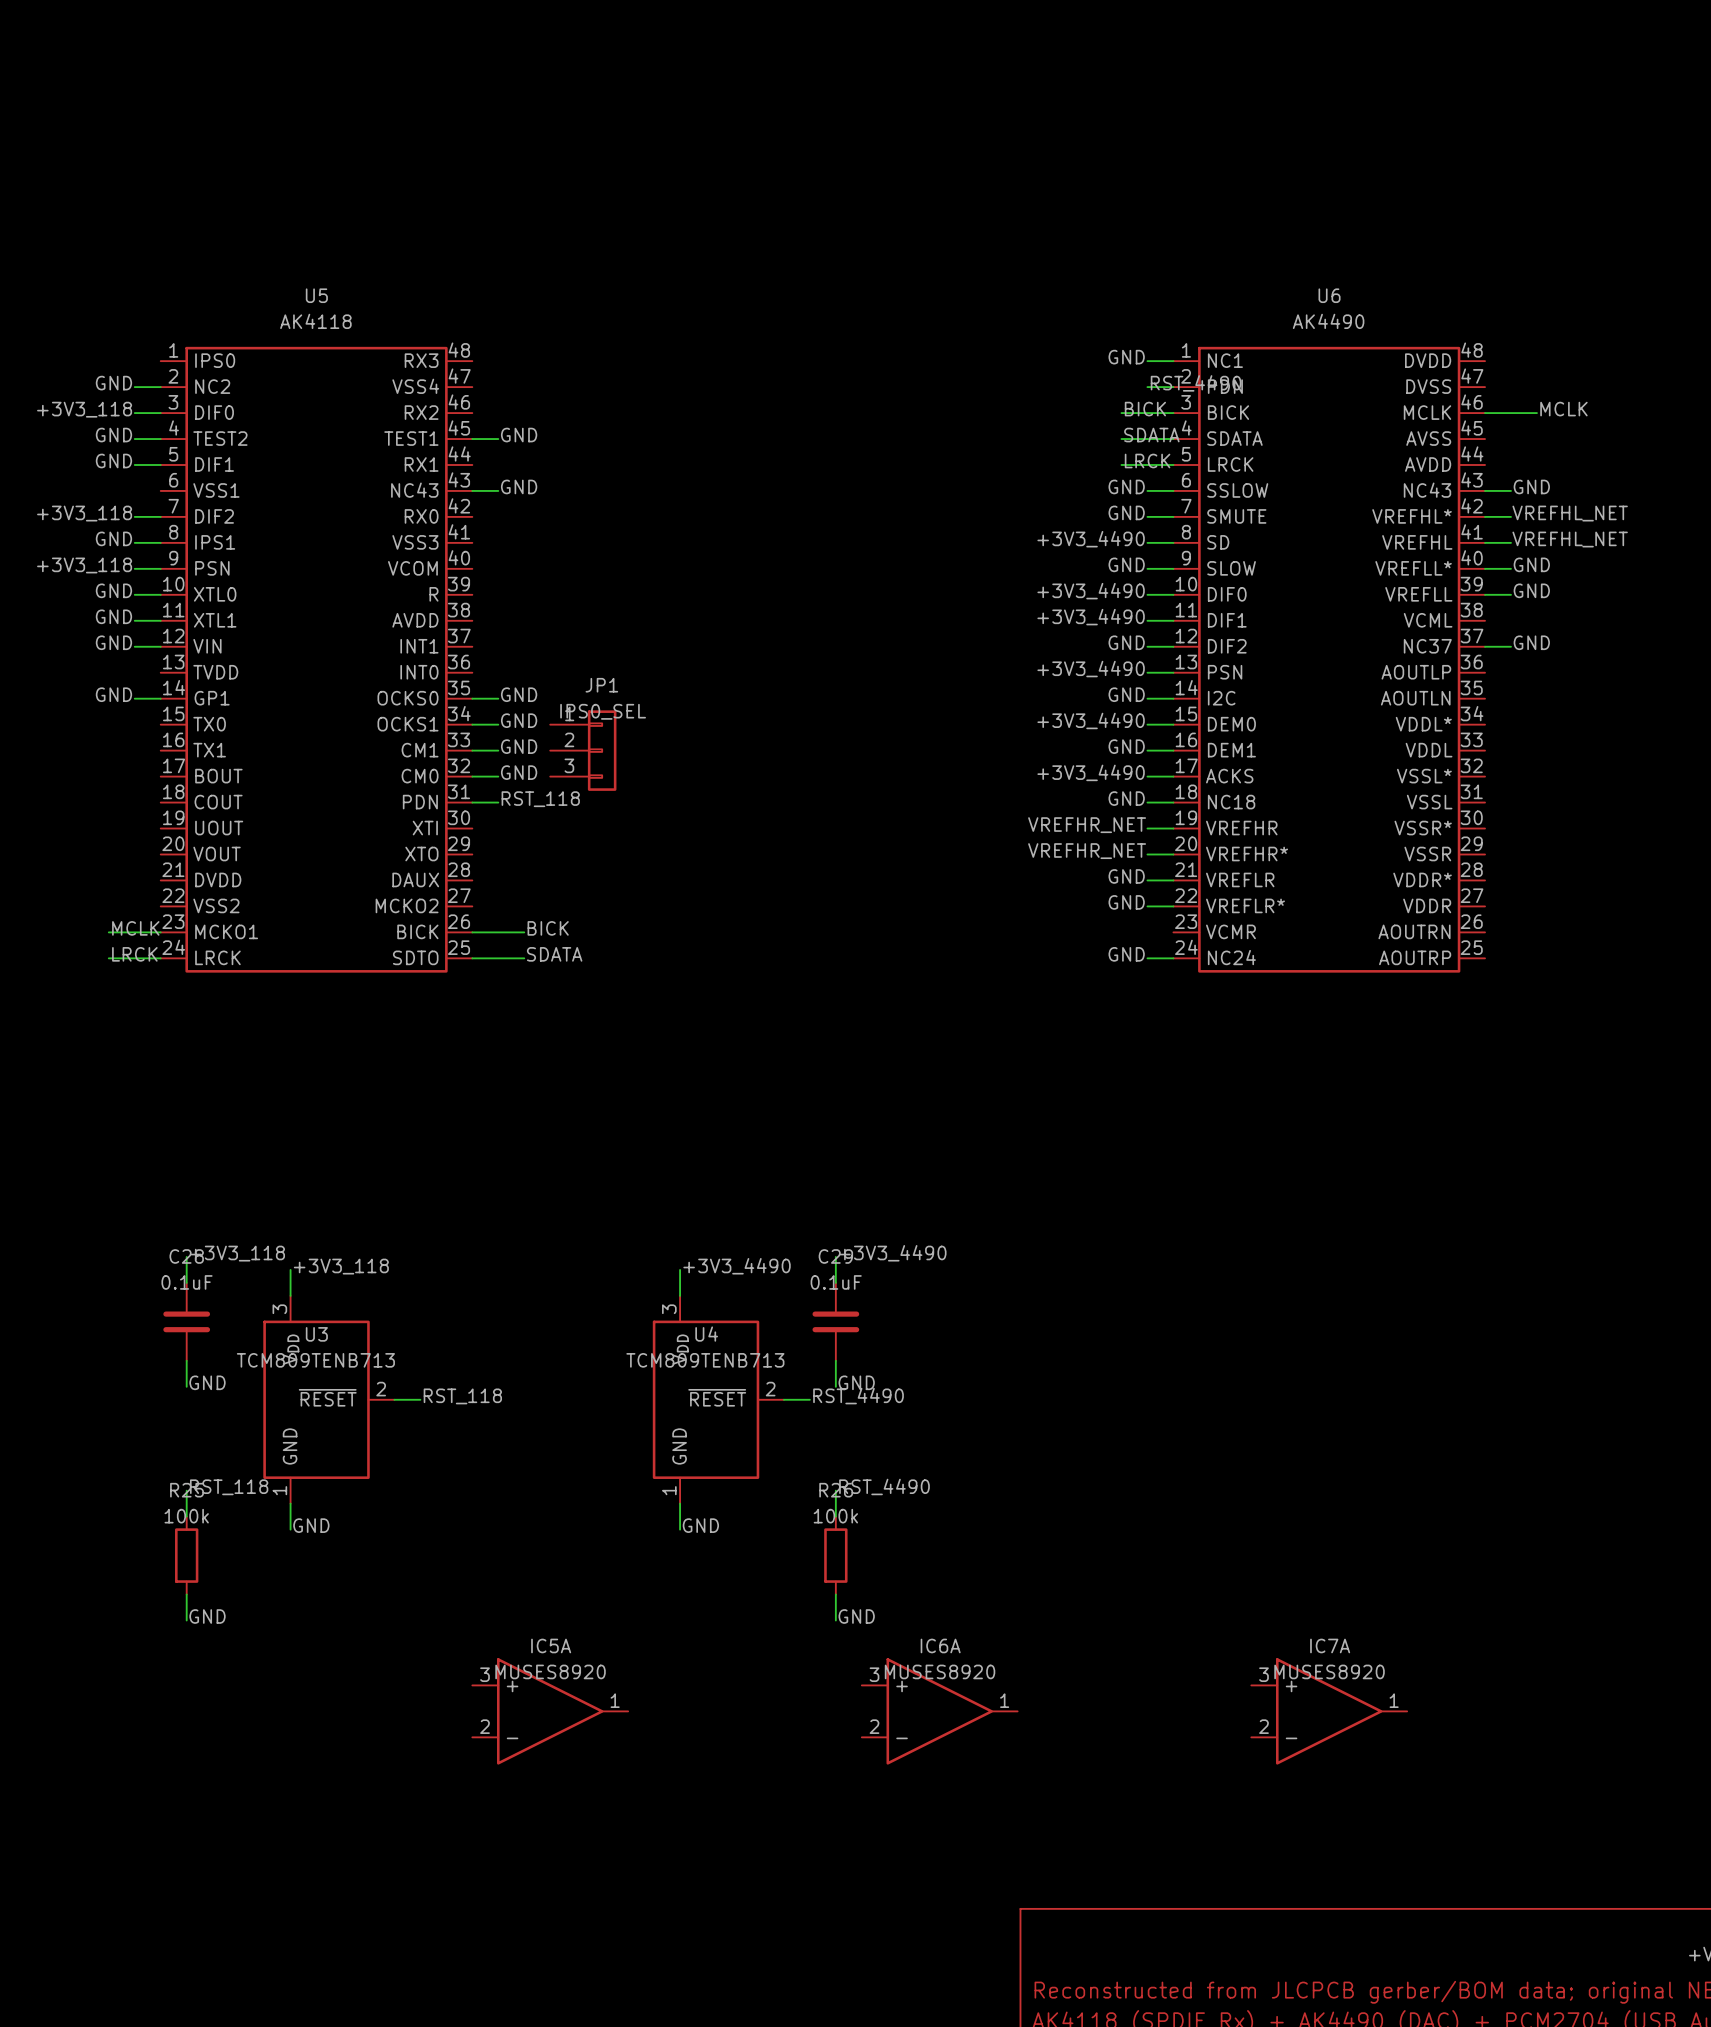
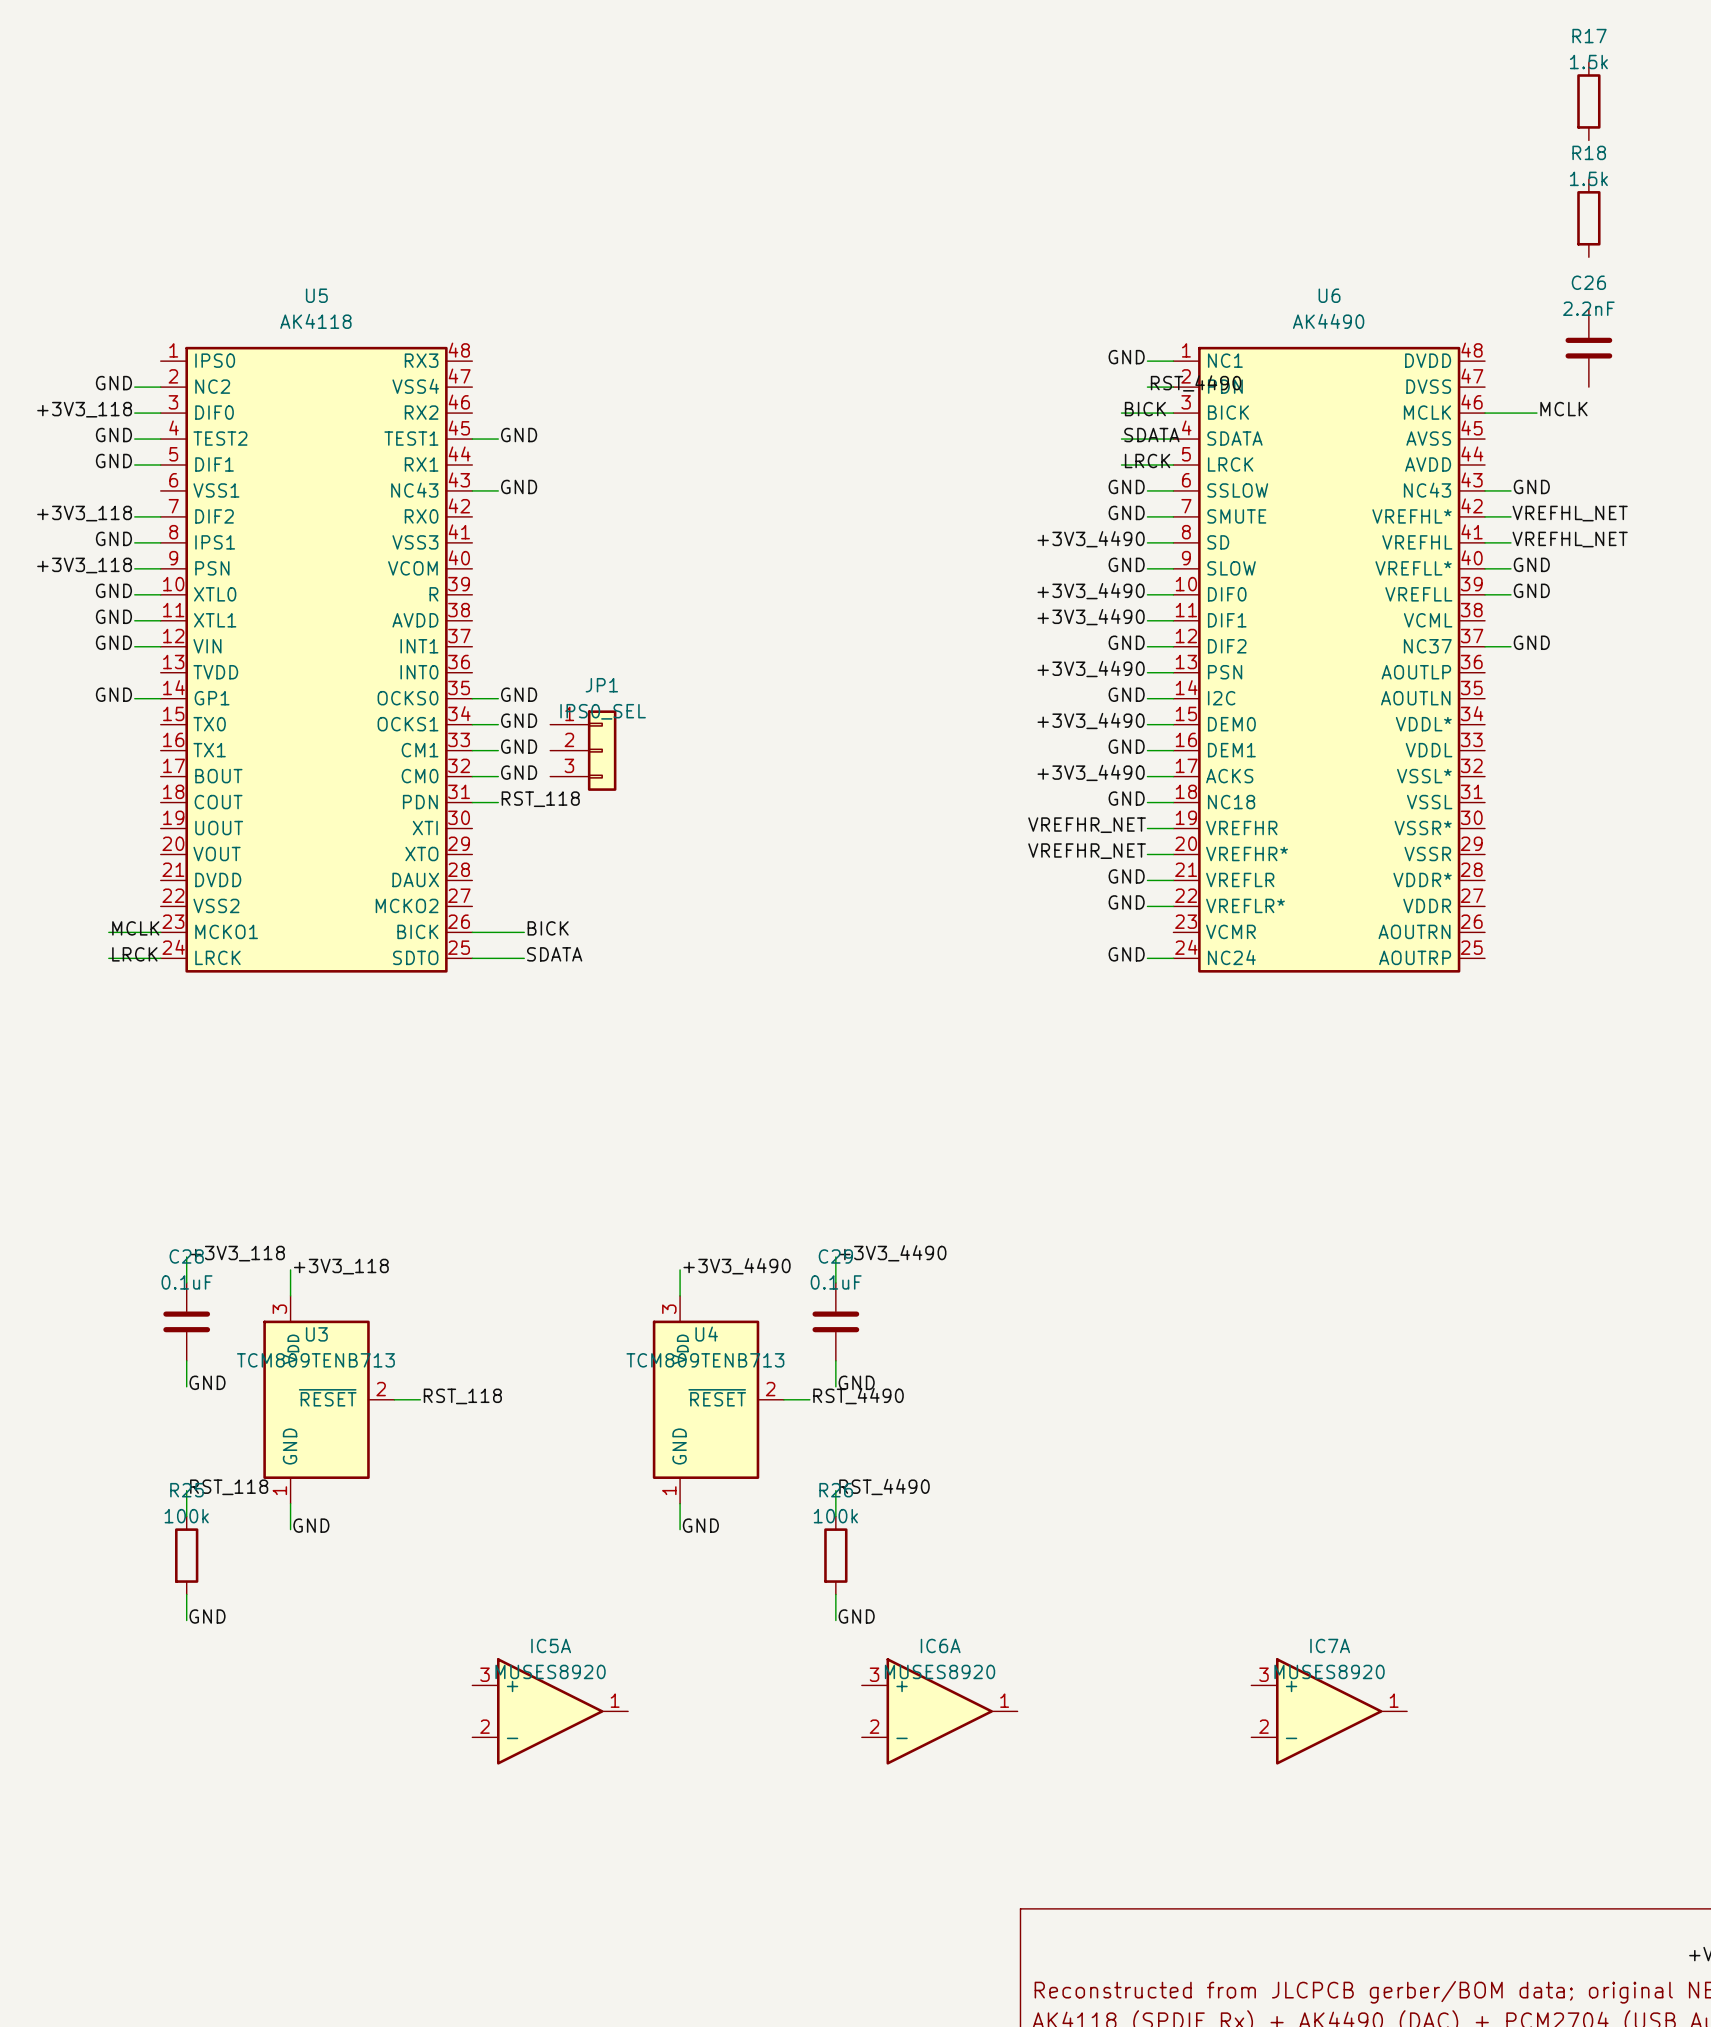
R17: none -> 1.5k (1588, 101)
R18: none -> 1.5k (1588, 218)
C26: none -> 2.2nF (1588, 348)

